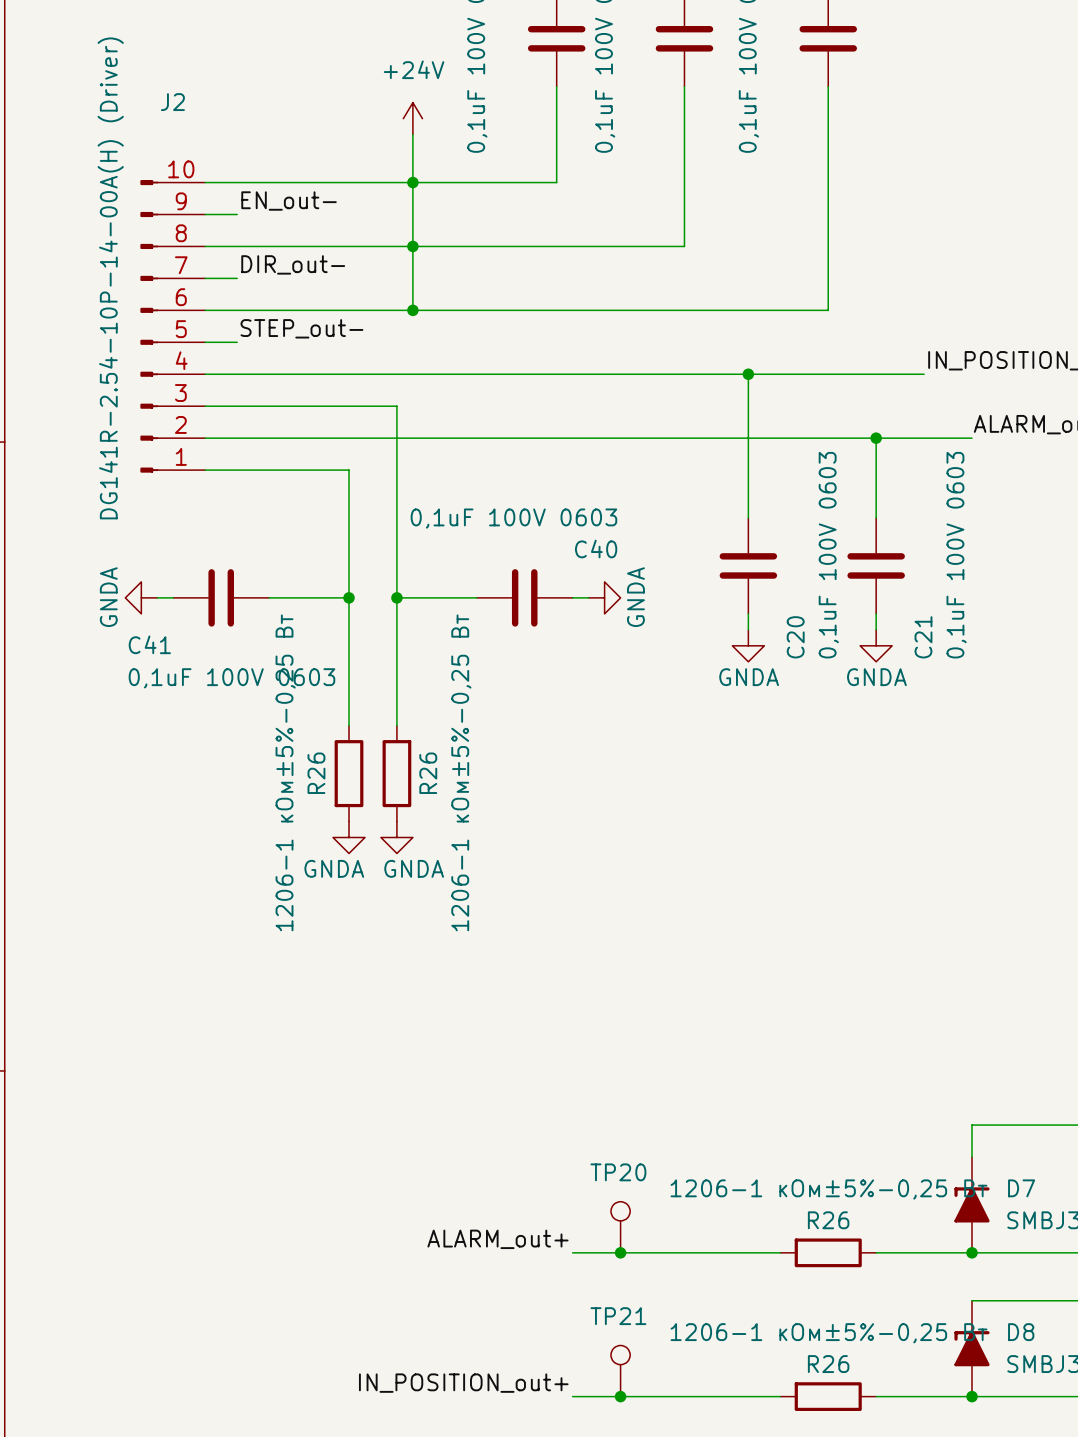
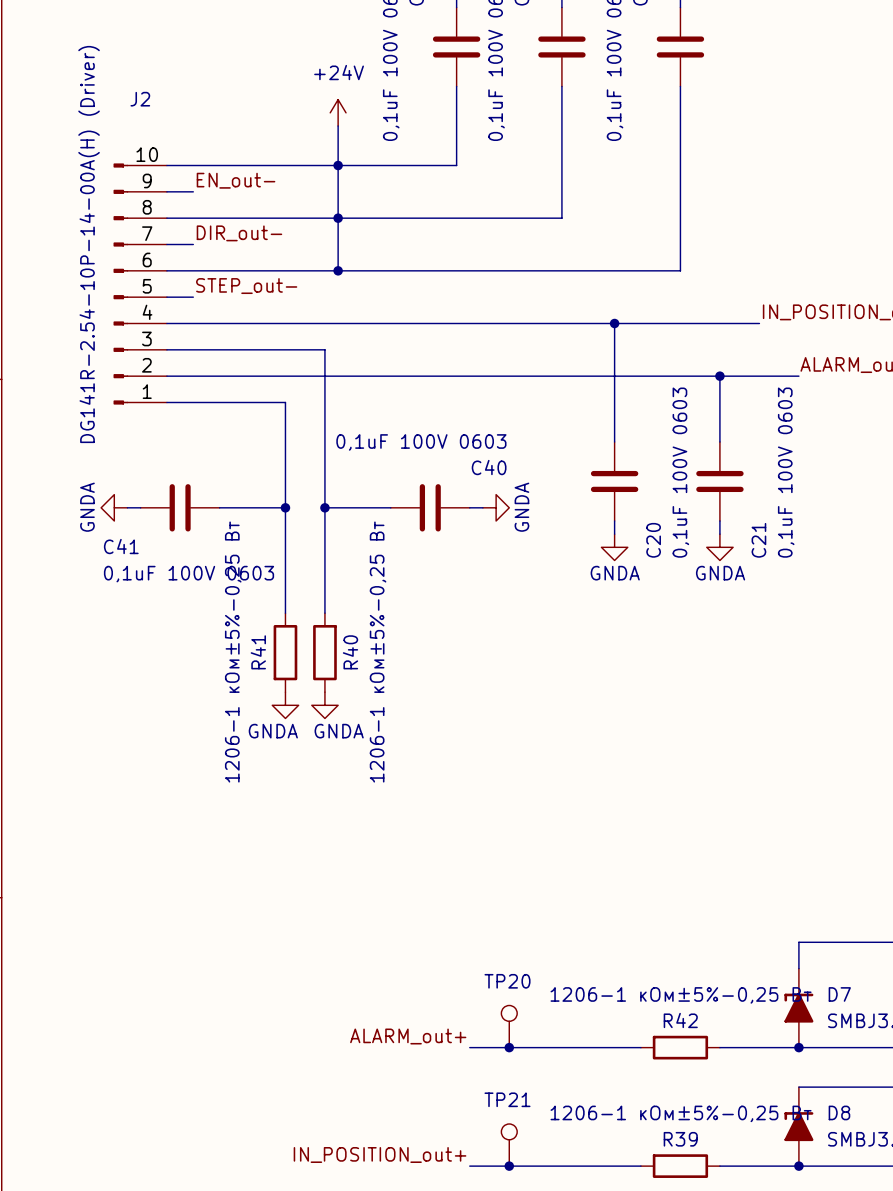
R26 name: R26 (316, 773) -> R41 (258, 652)
R26 name: R26 (428, 773) -> R40 (350, 652)
R26 name: R26 (828, 1220) -> R42 (680, 1020)
R26 name: R26 (828, 1364) -> R39 (680, 1139)

